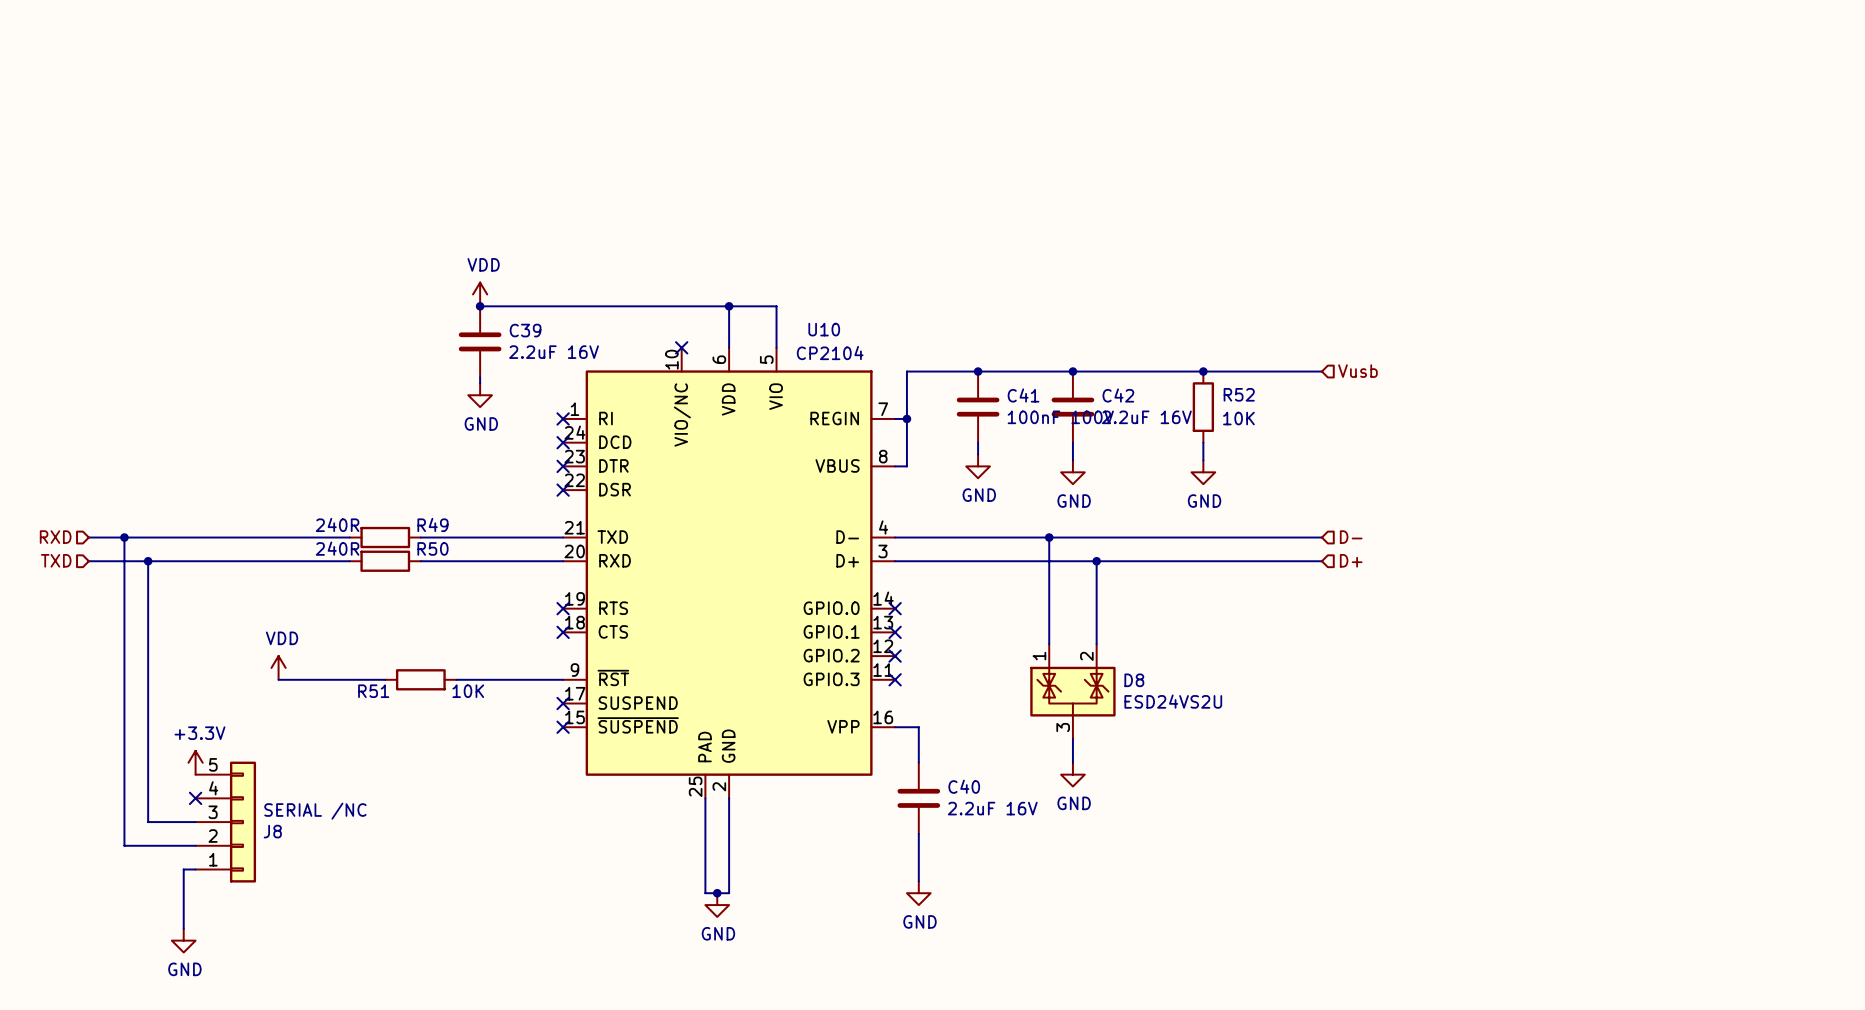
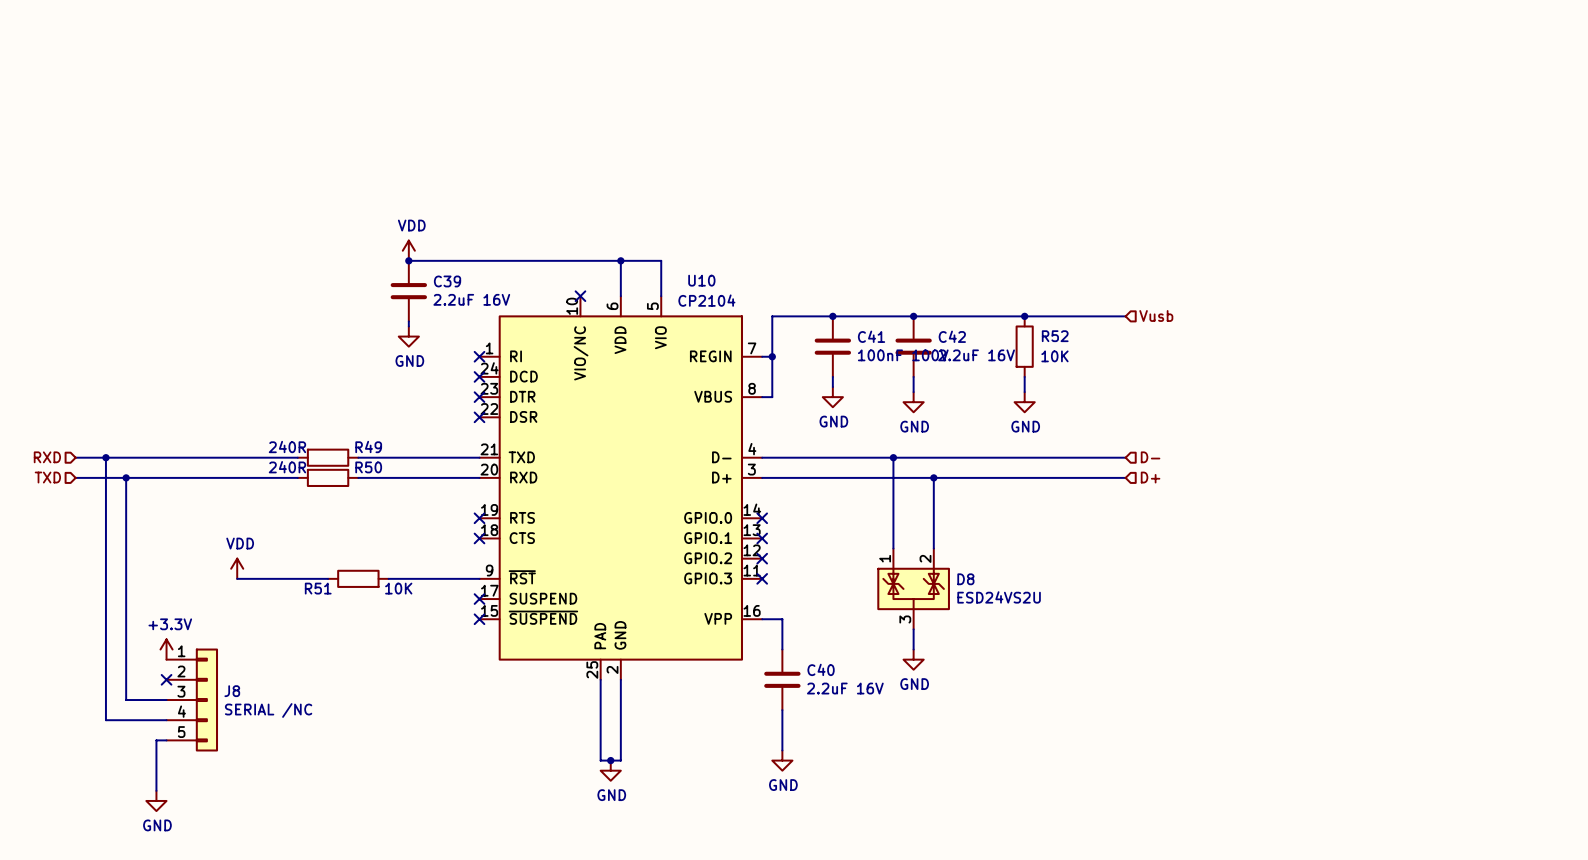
J8 flip: as is (243, 822) -> up-down (206, 700)

